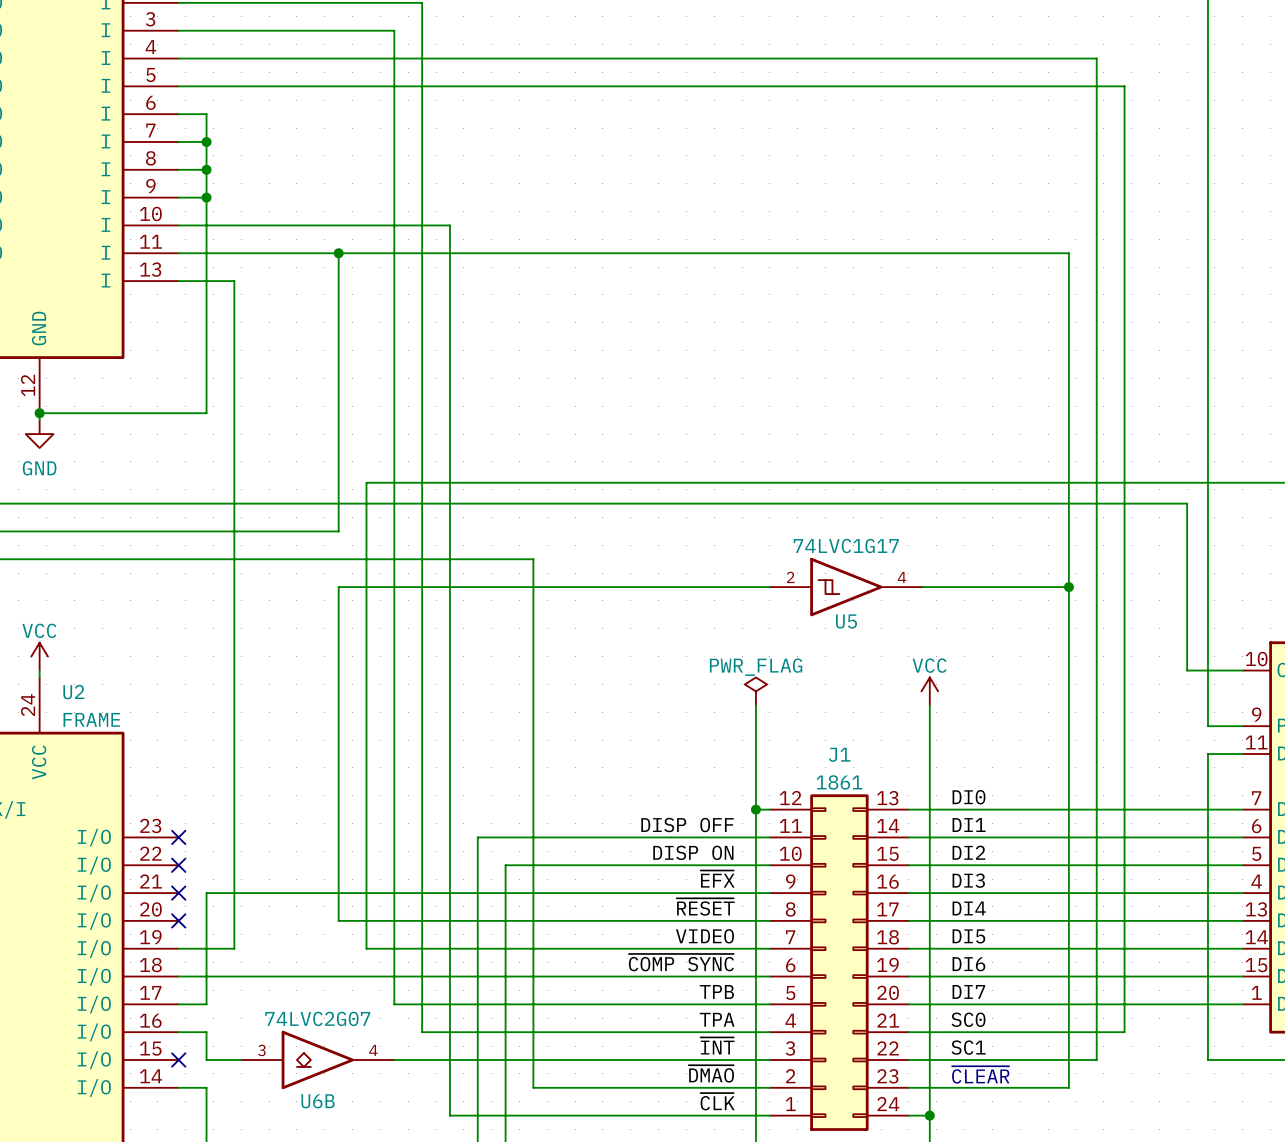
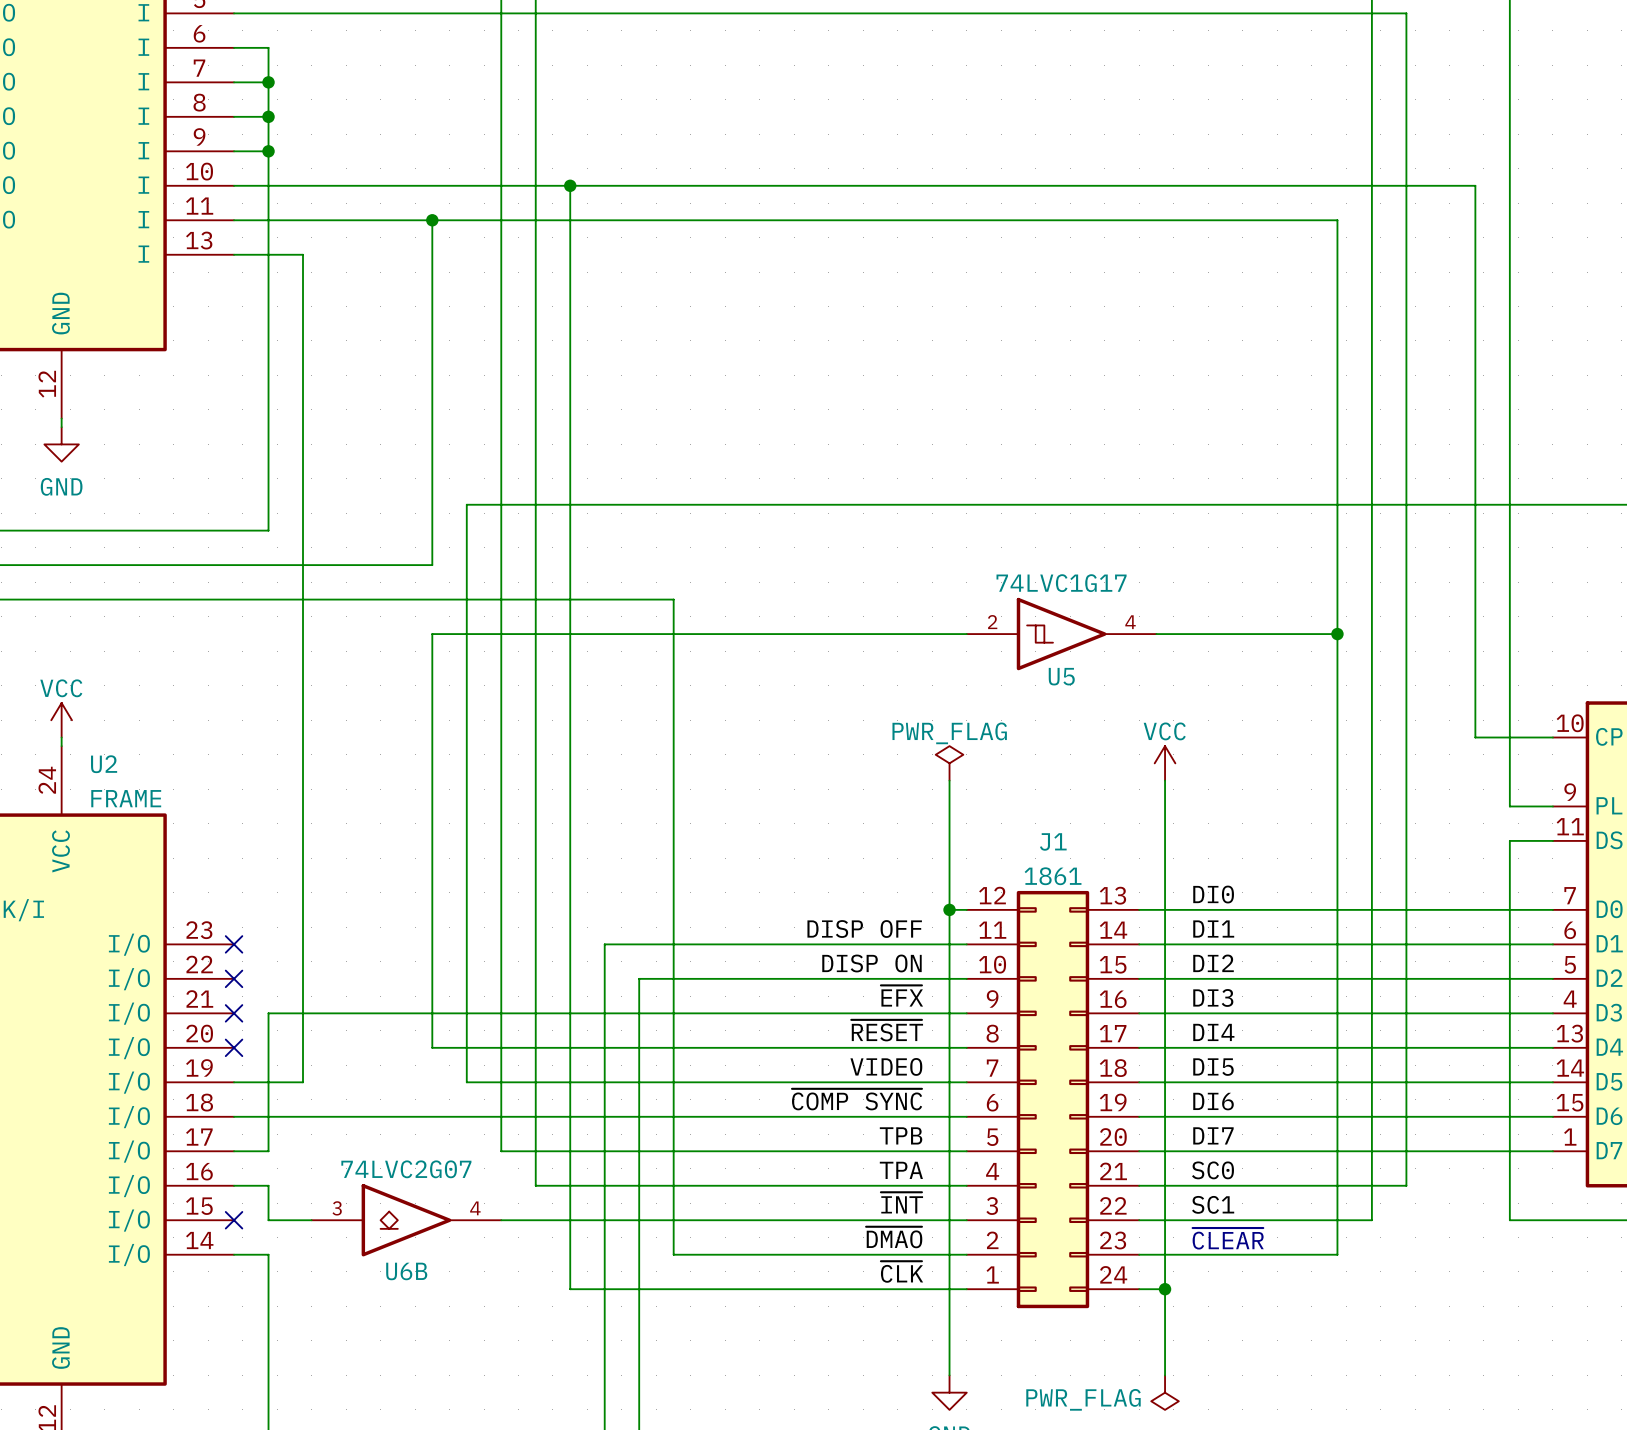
junction: none -> (570, 185)
wire: (39, 413) (206, 413) -> (268, 530) (268, 418)
junction: (39, 413) -> none
wire: (206, 503) (1187, 503) (1187, 670) -> (570, 185) (1475, 185) (1475, 737) (1483, 737)

